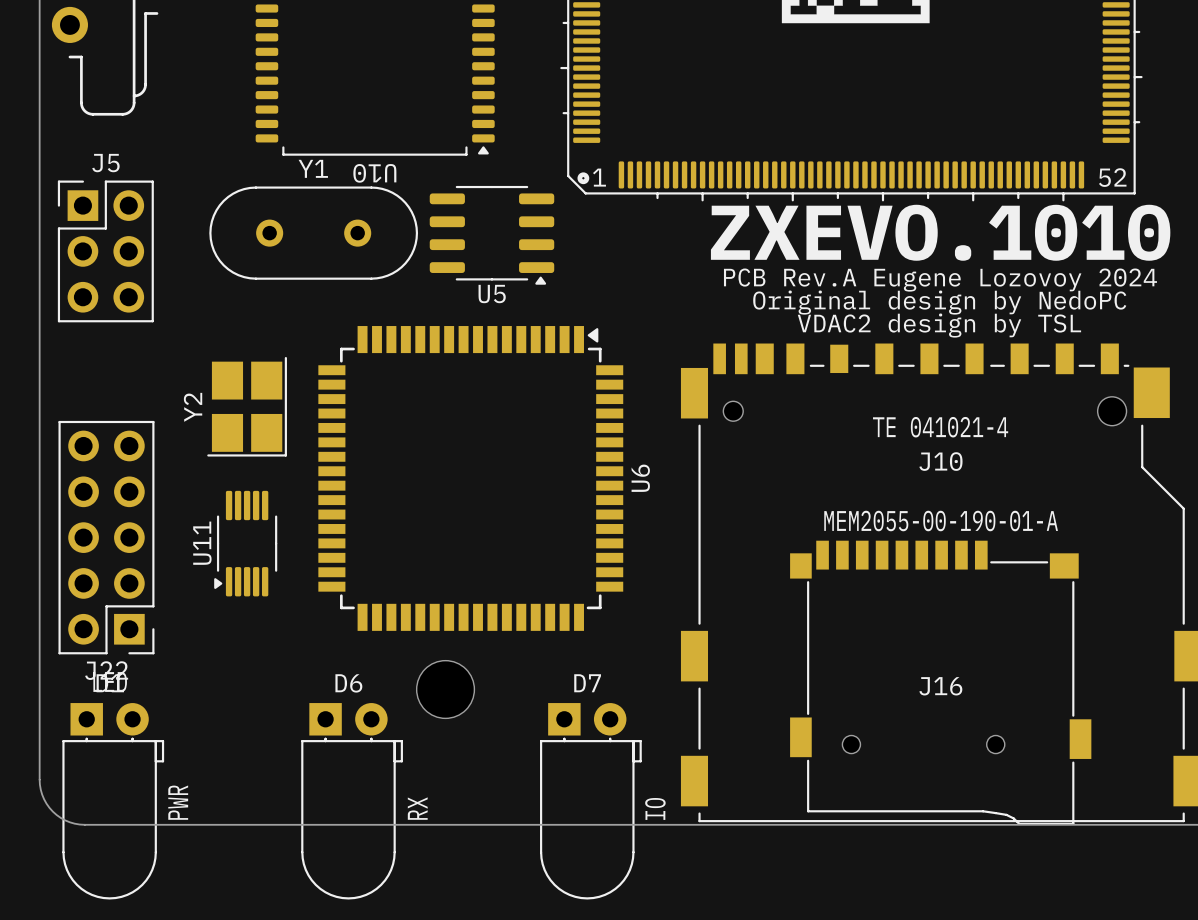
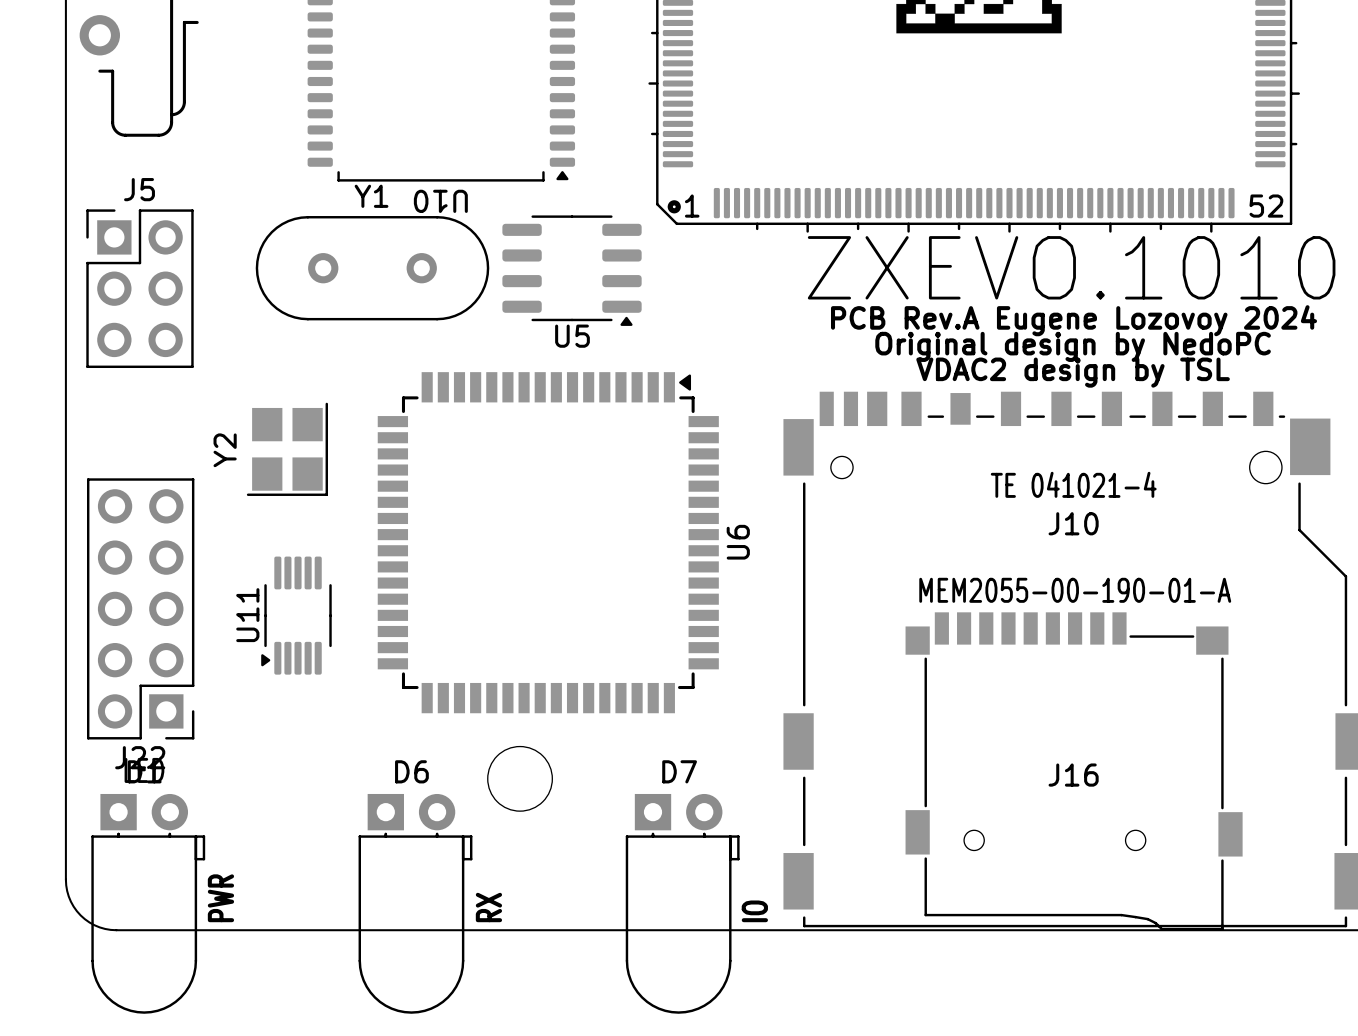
Y2 footprint: [207, 356, 287, 457] -> [246, 402, 328, 496]

